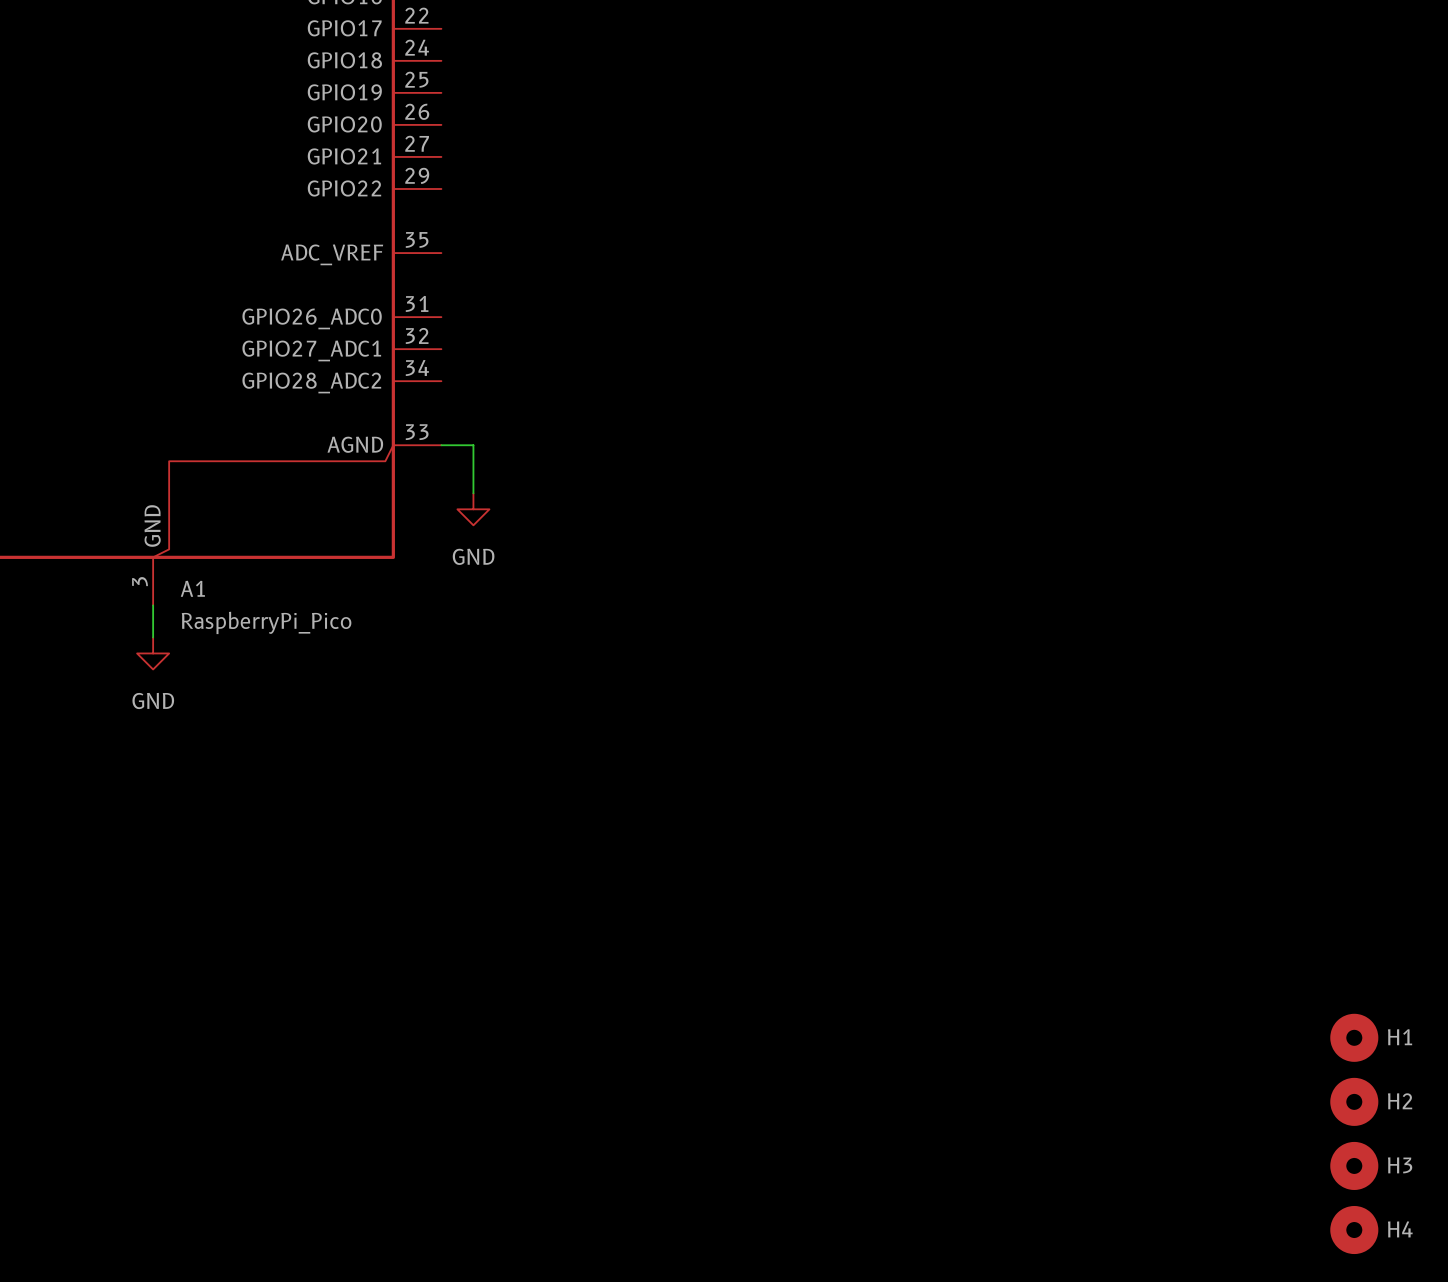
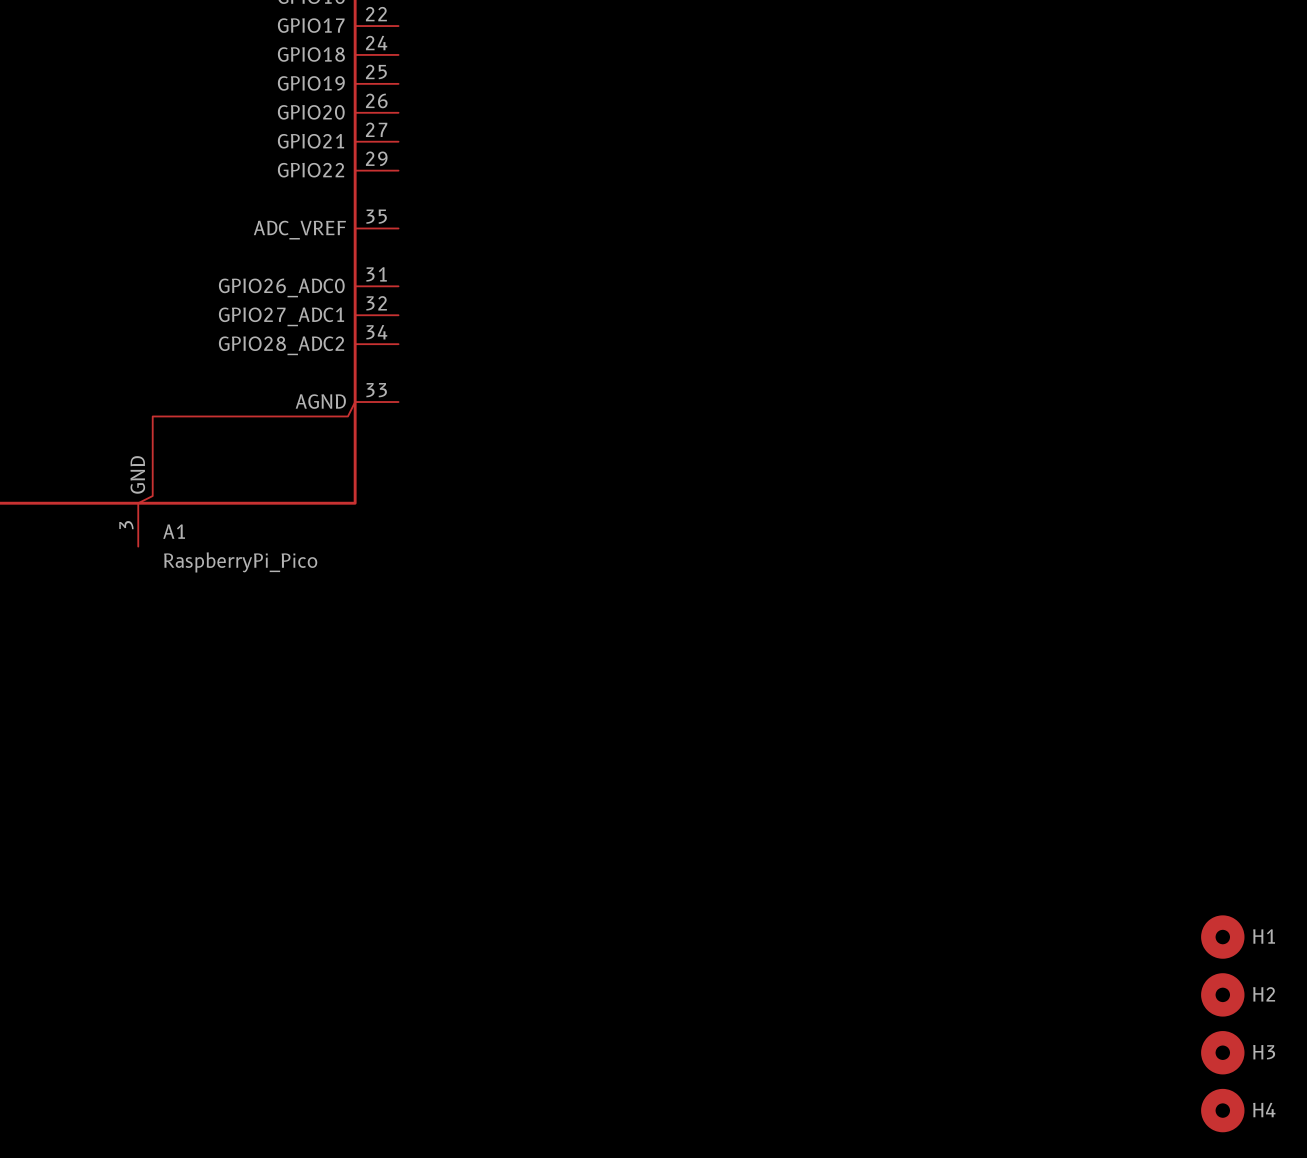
wire: (441, 445) (473, 445) (473, 493) -> none
power symbol: GND (473, 509) -> none
wire: (153, 605) (153, 637) -> none
power symbol: GND (153, 653) -> none

